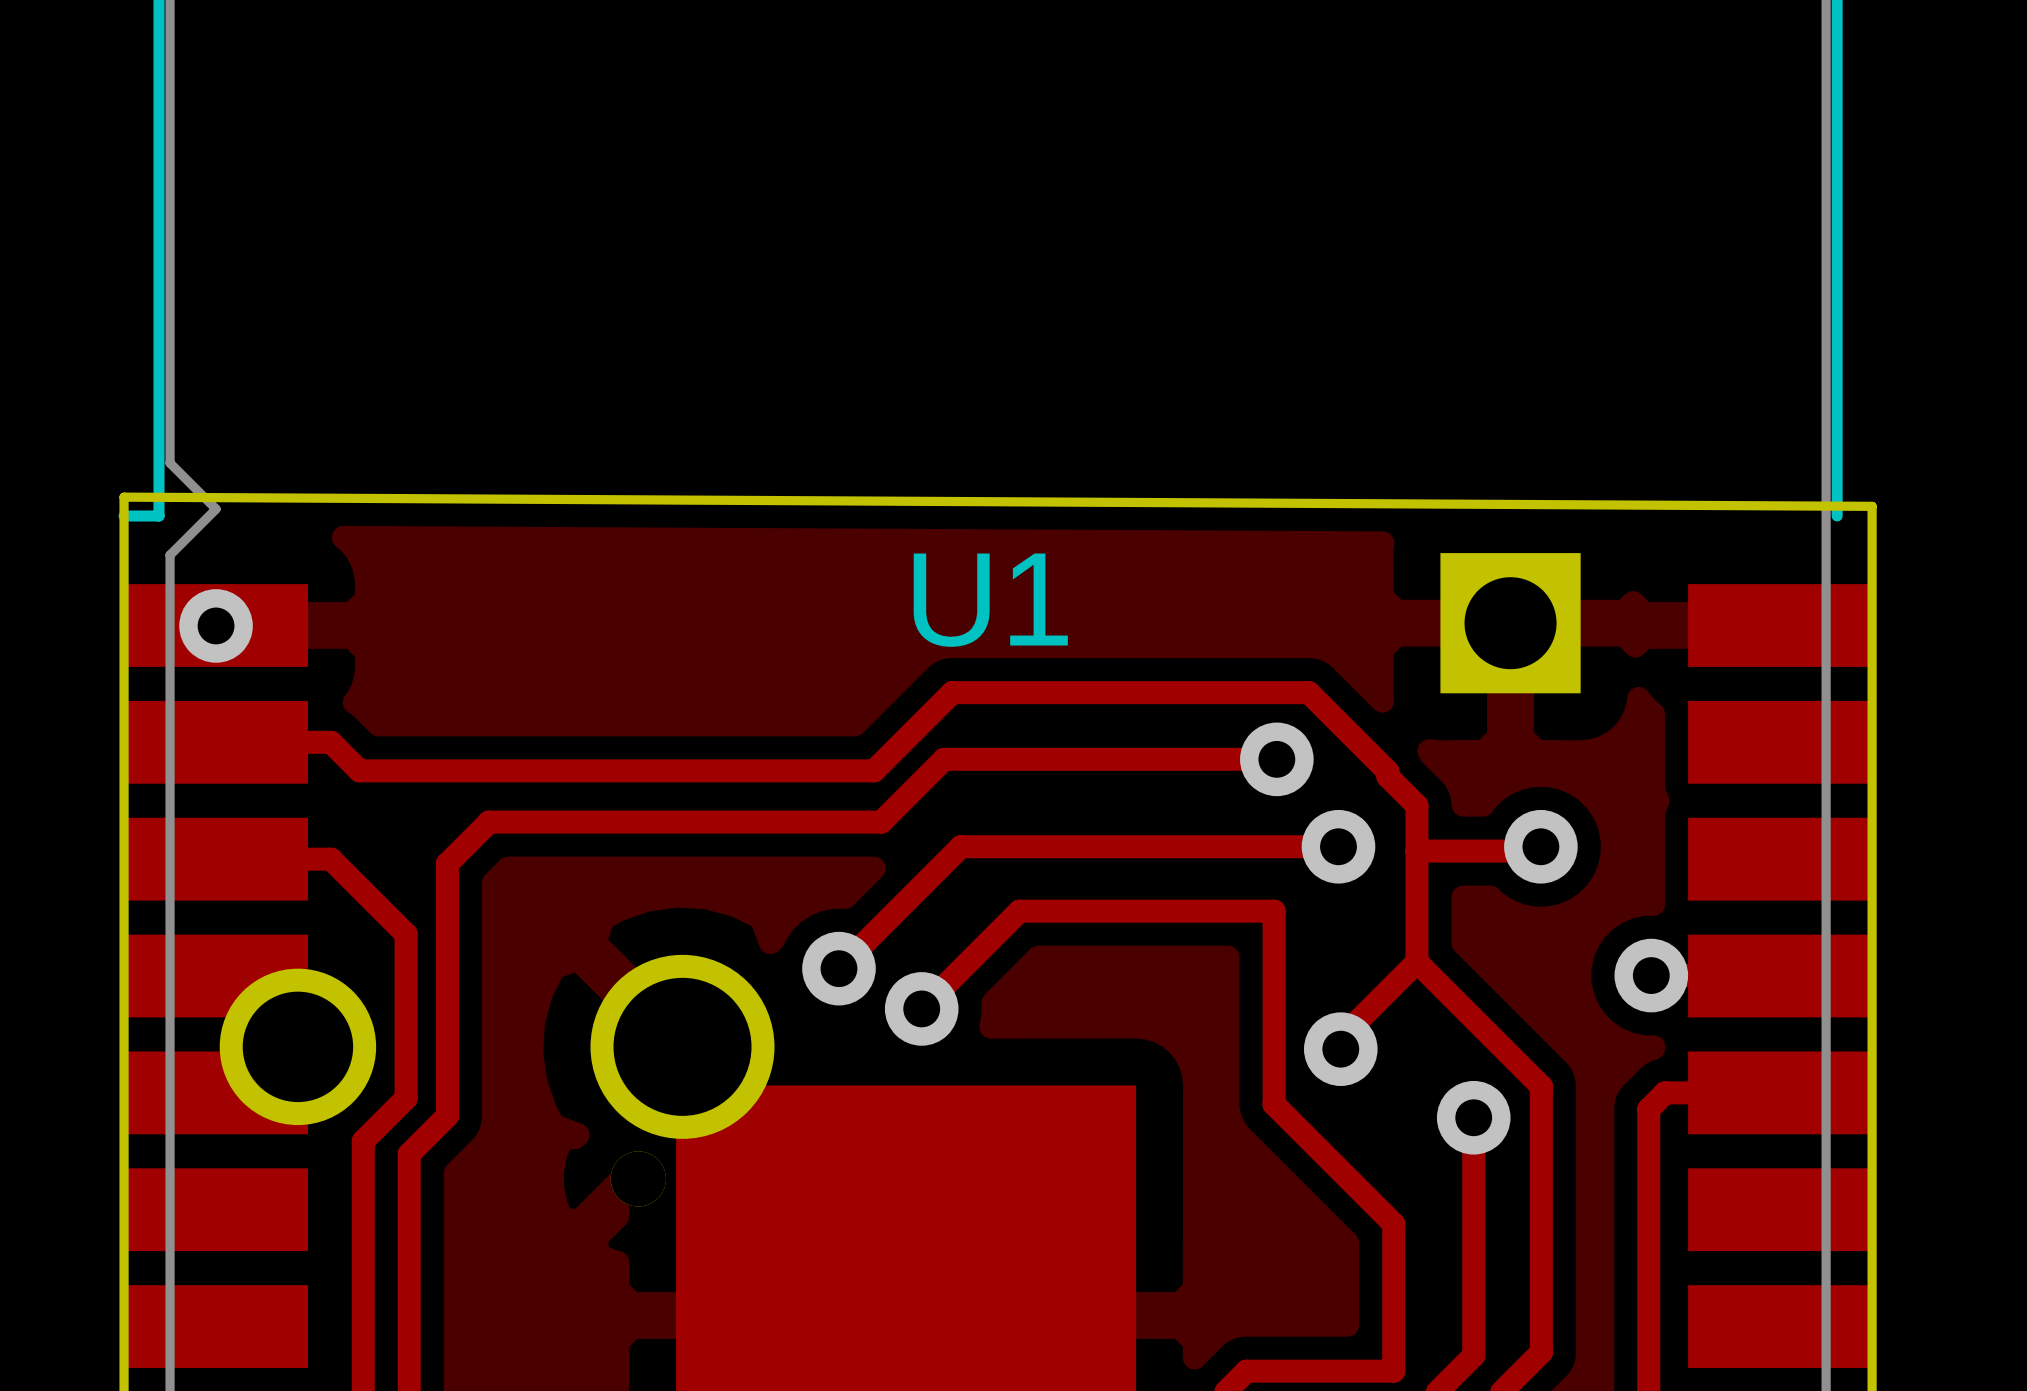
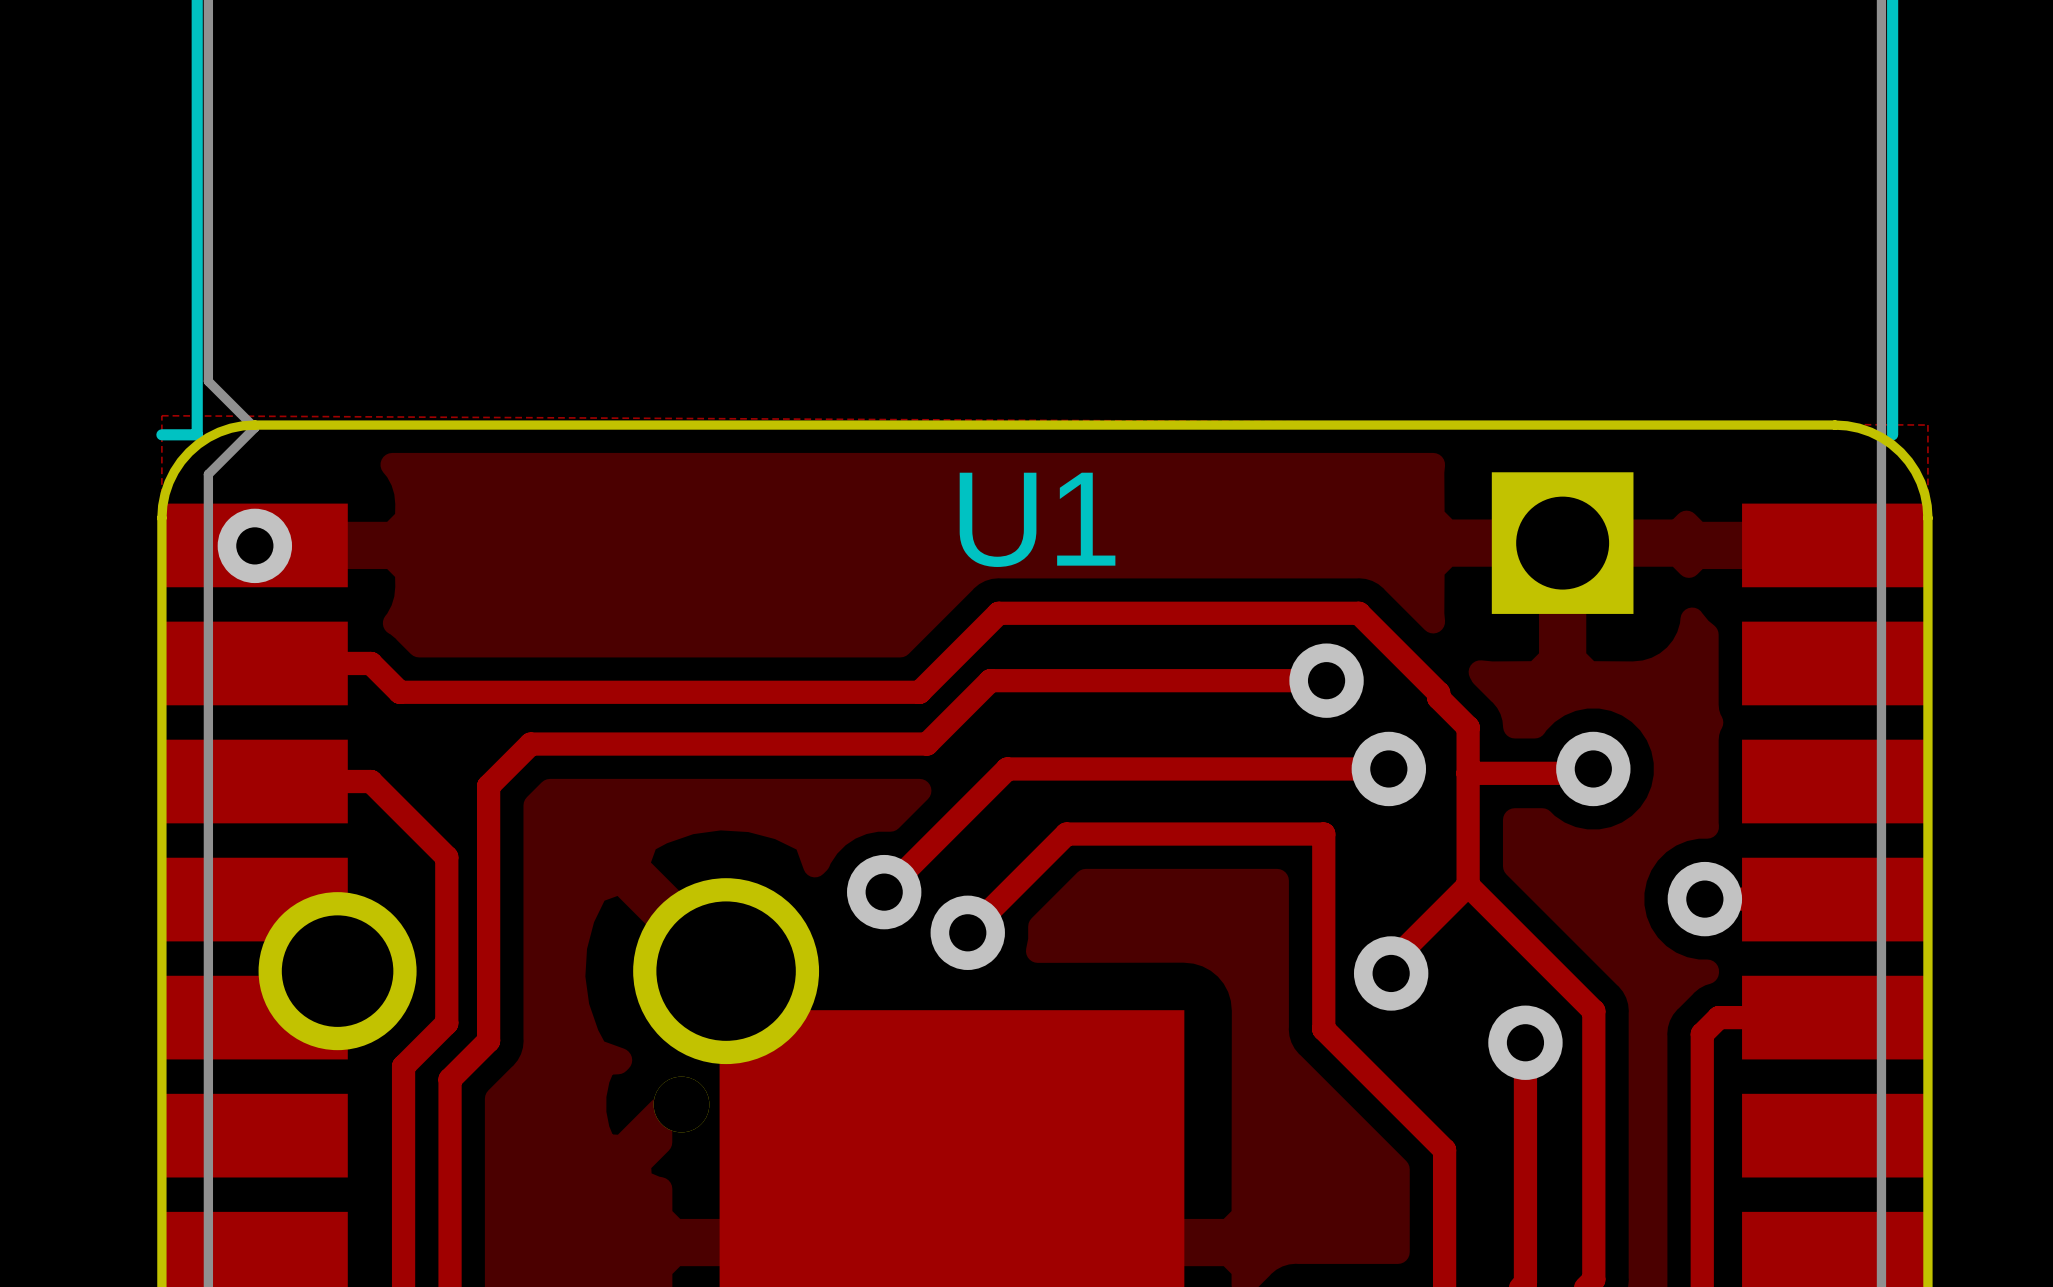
board edge: (124, 598) (124, 497) (1872, 506) (1872, 598) -> (161, 518) (165, 493) (168, 482) (181, 461) (189, 452) (198, 444) (219, 432) (230, 428) (254, 425) (1834, 425) (1859, 428) (1870, 432) (1891, 444) (1900, 452) (1908, 461) (1920, 482) (1924, 493) (1927, 518)

